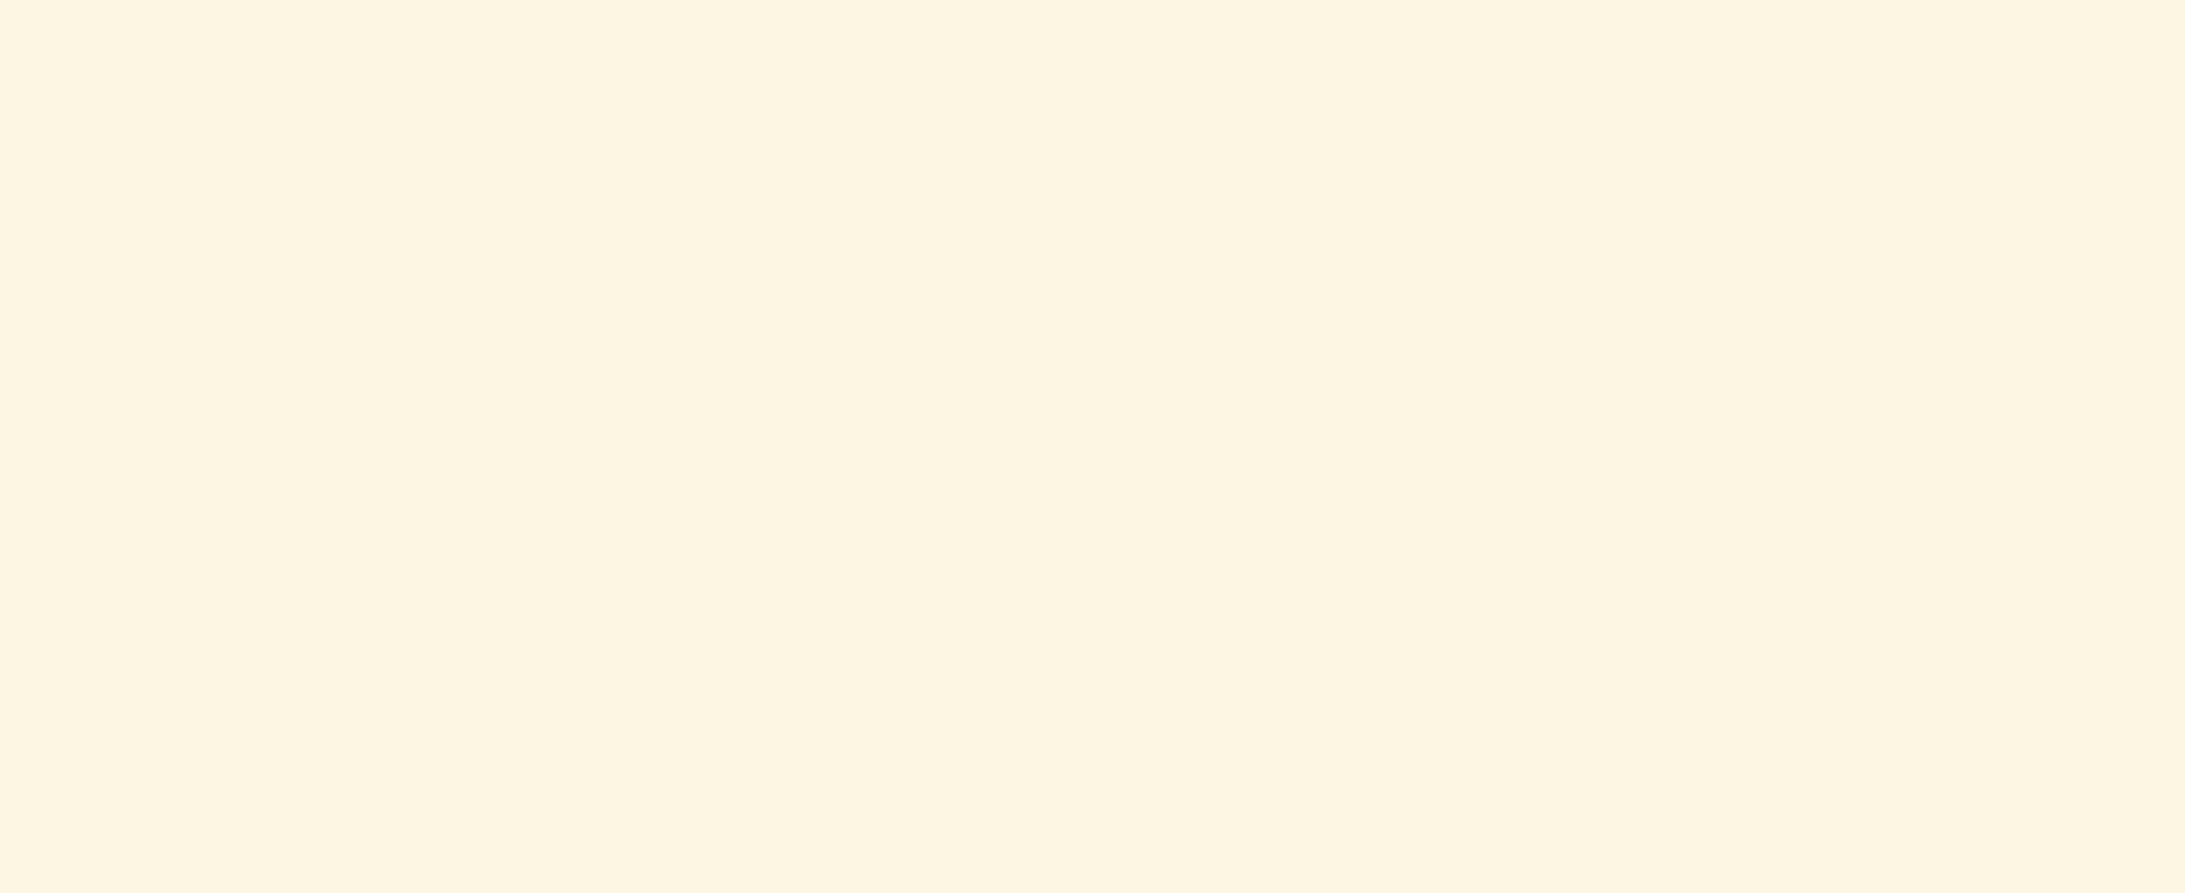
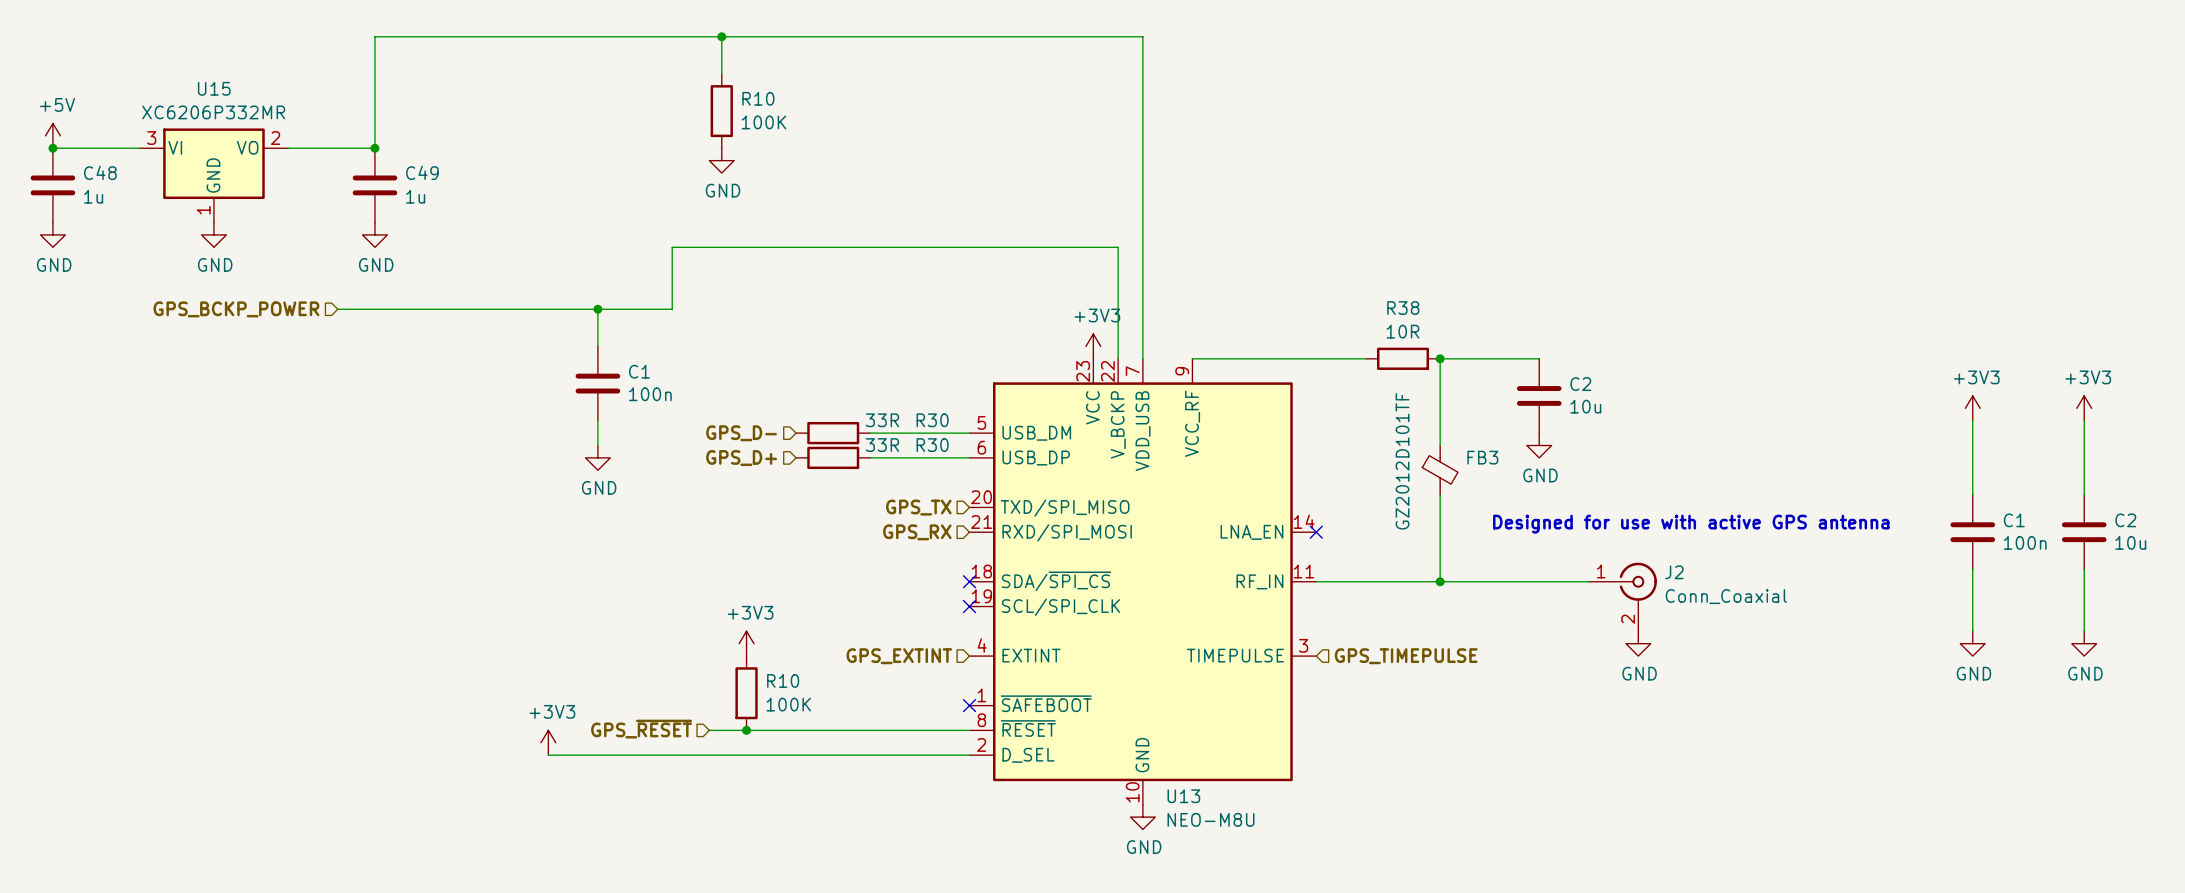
wire: none -> (721, 36) (721, 73)
junction: none -> (721, 36)
R10: none -> 100K (721, 111)
power symbol: none -> +5V (52, 135)
wire: none -> (52, 148) (139, 148)
junction: none -> (52, 148)
wire: none -> (288, 148) (374, 148) (374, 36) (1142, 36) (1142, 358)
junction: none -> (374, 148)
power symbol: none -> GND (721, 160)
U15: none -> XC6206P332MR (213, 175)
C48: none -> 1u (52, 185)
C49: none -> 1u (374, 185)
power symbol: none -> GND (52, 234)
power symbol: none -> GND (213, 234)
power symbol: none -> GND (374, 234)
hierarchical label: none -> GPS_BCKP_POWER (236, 309)
wire: none -> (337, 309) (672, 309) (672, 247) (1118, 247) (1118, 358)
wire: none -> (597, 309) (597, 346)
junction: none -> (597, 309)
power symbol: none -> +3V3 (1093, 346)
wire: none -> (1192, 358) (1365, 358)
R38: none -> 10R (1403, 358)
junction: none -> (1440, 358)
wire: none -> (1539, 358) (1440, 358) (1440, 445)
C1: none -> 100n (597, 383)
C2: none -> 10u (1539, 395)
power symbol: none -> +3V3 (1972, 408)
power symbol: none -> +3V3 (2084, 408)
wire: none -> (597, 420) (597, 445)
wire: none -> (1972, 420) (1972, 495)
wire: none -> (2084, 420) (2084, 495)
hierarchical label: none -> GPS_D- (741, 433)
R30: none -> 33R (833, 433)
wire: none -> (870, 433) (969, 433)
power symbol: none -> GND (1539, 445)
power symbol: none -> GND (597, 457)
R30: none -> 33R (833, 457)
wire: none -> (870, 457) (969, 457)
hierarchical label: none -> GPS_D+ (741, 458)
FB3: none -> GZ2012D101TF (1440, 470)
wire: none -> (1440, 495) (1440, 581)
hierarchical label: none -> GPS_TX (918, 507)
text: none -> Designed for use with active GPS antenna (1691, 524)
hierarchical label: none -> GPS_RX (917, 532)
no-connect mark: none -> (1316, 532)
C1: none -> 100n (1972, 532)
C2: none -> 10u (2084, 532)
wire: none -> (1972, 569) (1972, 631)
wire: none -> (2084, 569) (2084, 631)
no-connect mark: none -> (969, 581)
U13: none -> NEO-M8U (1142, 581)
wire: none -> (1316, 581) (1588, 581)
junction: none -> (1440, 581)
J2: none -> Conn_Coaxial (1622, 597)
no-connect mark: none -> (969, 606)
power symbol: none -> +3V3 (746, 643)
power symbol: none -> GND (1638, 643)
power symbol: none -> GND (1972, 643)
power symbol: none -> GND (2084, 643)
hierarchical label: none -> GPS_EXTINT (899, 656)
hierarchical label: none -> GPS_TIMEPULSE (1406, 656)
R10: none -> 100K (746, 693)
no-connect mark: none -> (969, 705)
hierarchical label: none -> GPS_~{RESET} (641, 729)
wire: none -> (709, 730) (969, 730)
junction: none -> (746, 730)
power symbol: none -> +3V3 (548, 742)
wire: none -> (548, 755) (969, 755)
power symbol: none -> GND (1142, 817)

